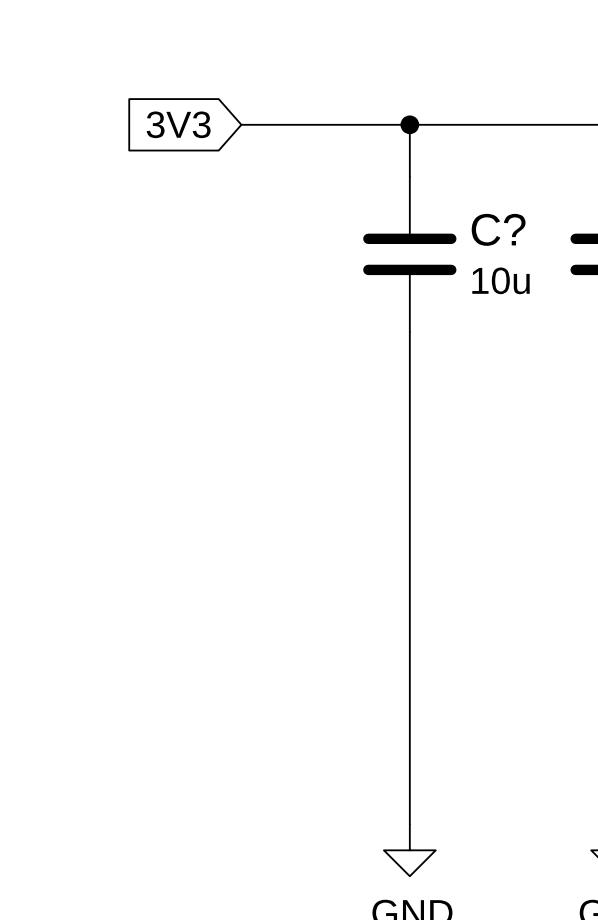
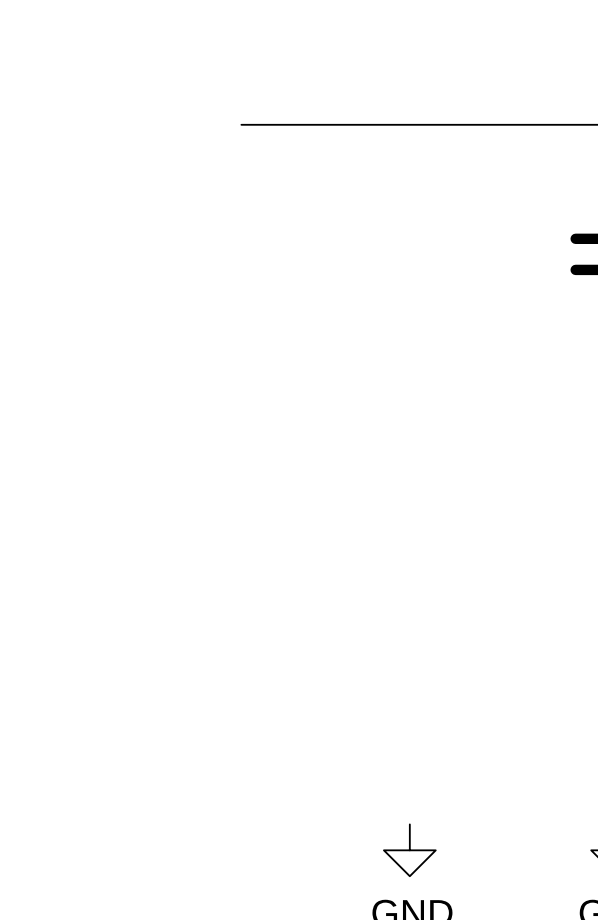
global label: 3V3 (178, 124) -> none
wire: (409, 124) (409, 176) -> none
junction: (409, 124) -> none
C?: (409, 254) -> none
wire: (409, 332) (409, 824) -> none

